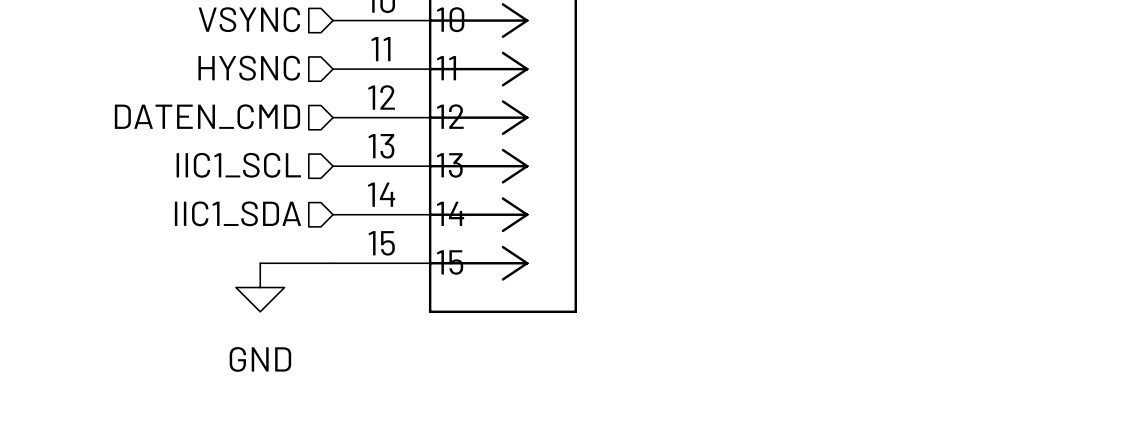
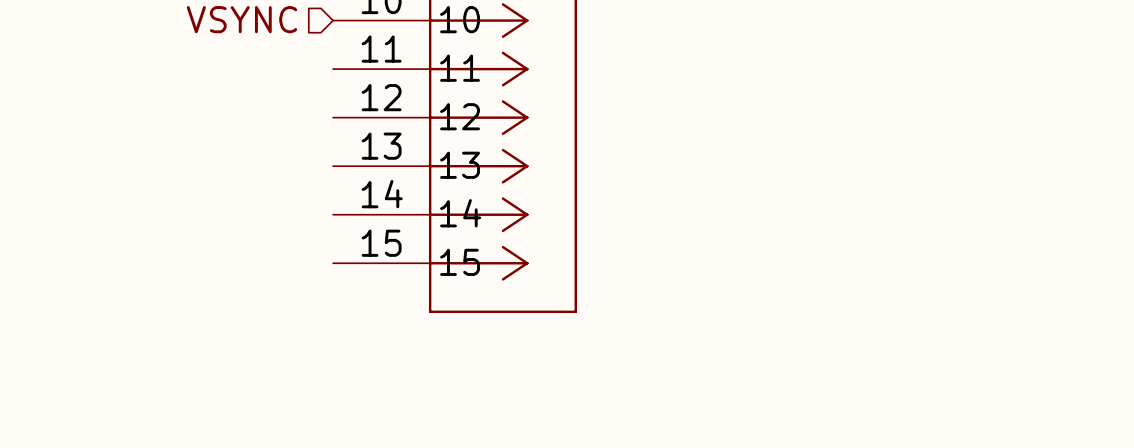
hierarchical label: HYSNC (249, 68) -> none
hierarchical label: DATEN_CMD (207, 116) -> none
hierarchical label: IIC1_SCL (238, 165) -> none
hierarchical label: IIC1_SDA (237, 213) -> none
wire: (260, 263) (333, 263) -> none
power symbol: GND (260, 287) -> none

